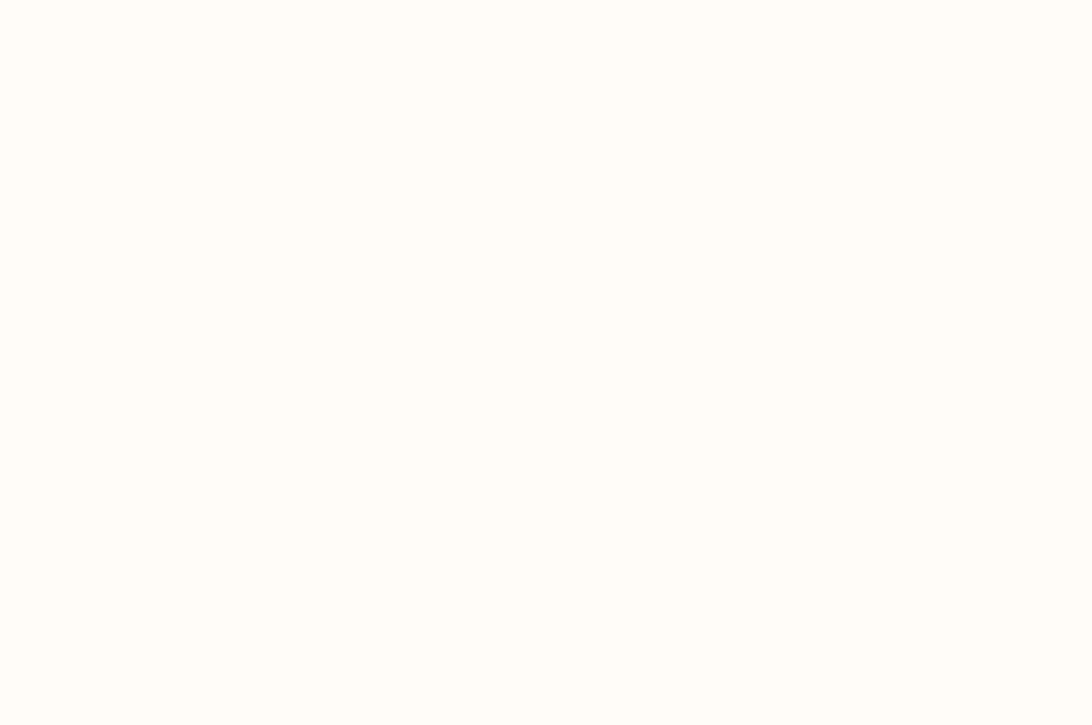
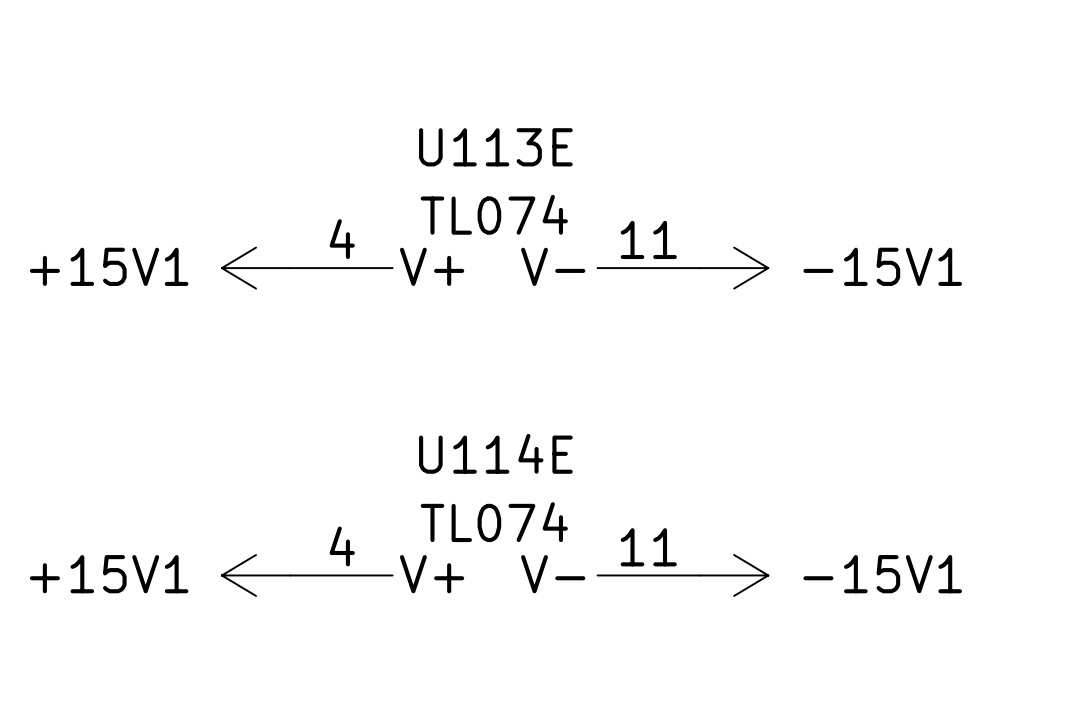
power symbol: none -> +15V1 (256, 268)
U113E: none -> TL074 (495, 268)
power symbol: none -> -15V1 (734, 268)
power symbol: none -> +15V1 (256, 575)
U114E: none -> TL074 (495, 575)
power symbol: none -> -15V1 (734, 575)

